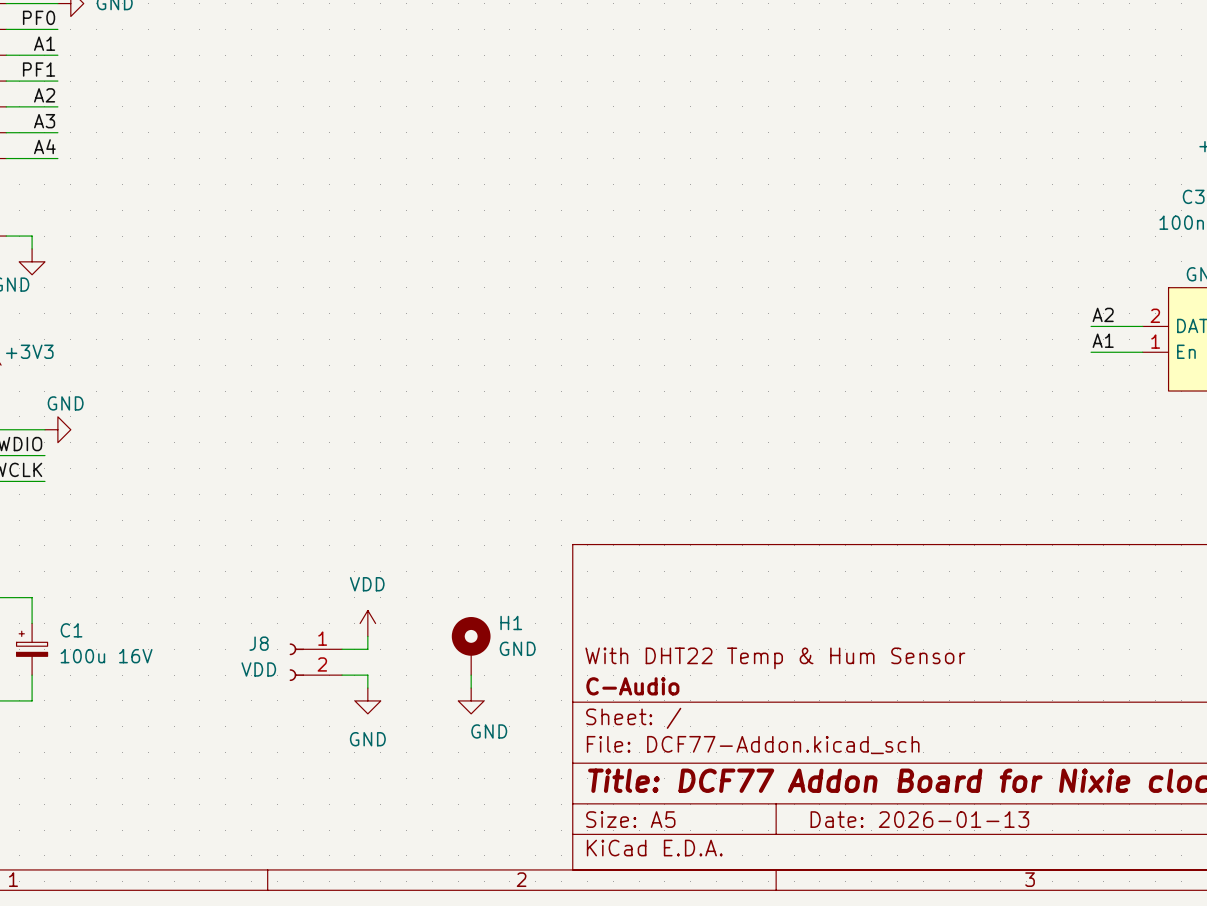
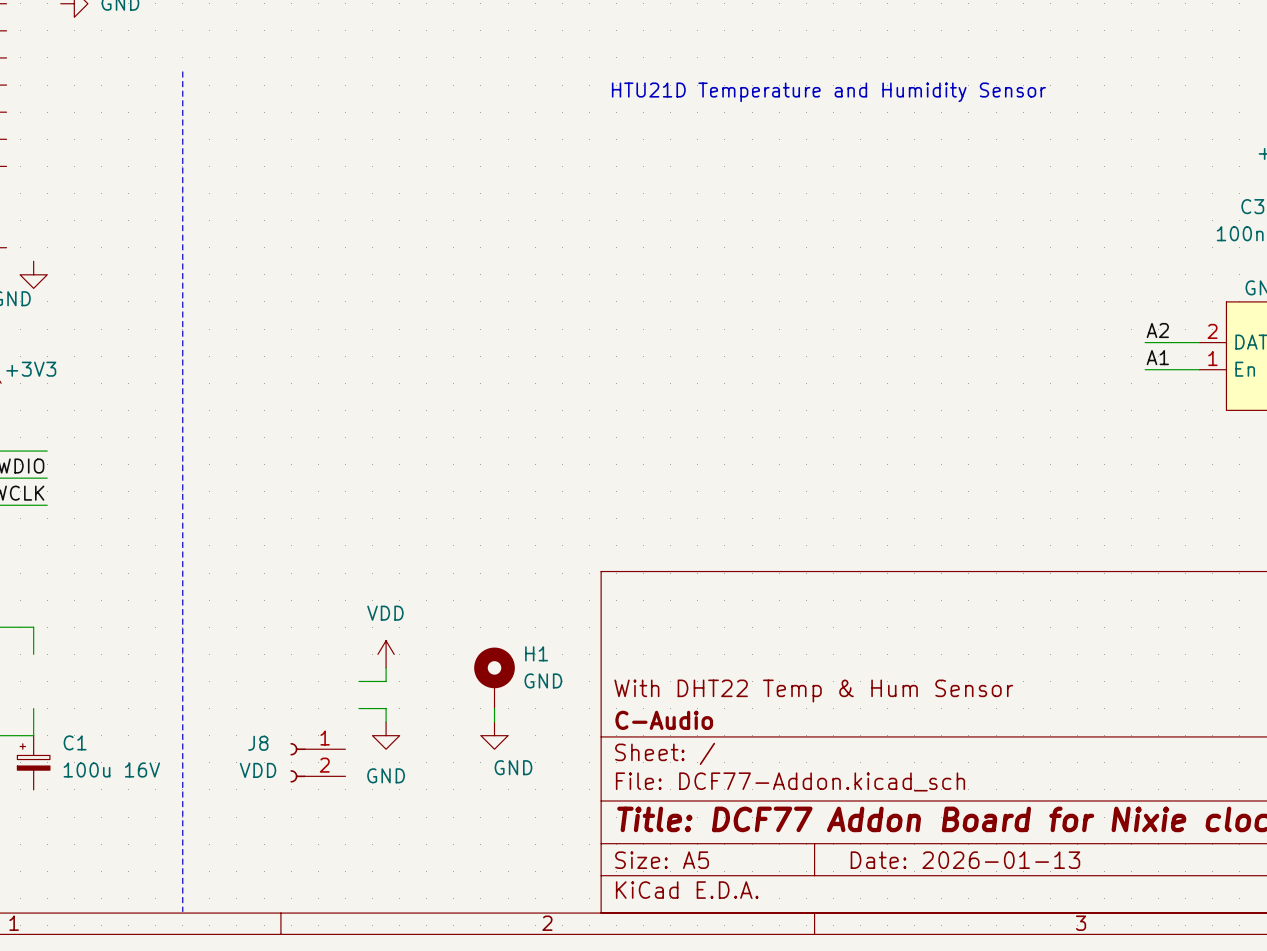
wire: (6, 3) (57, 3) -> none
label: PF0 (39, 17) -> none
wire: (6, 29) (57, 29) -> none
label: A1 (44, 43) -> none
wire: (6, 55) (57, 55) -> none
line: none -> (182, 71) (182, 911)
label: PF1 (39, 69) -> none
wire: (6, 81) (57, 81) -> none
text: none -> HTU21D Temperature and Humidity Sensor (828, 92)
label: A2 (44, 95) -> none
wire: (6, 106) (57, 106) -> none
label: A3 (44, 121) -> none
wire: (6, 132) (57, 132) -> none
label: A4 (44, 146) -> none
wire: (6, 158) (57, 158) -> none
wire: (6, 236) (32, 236) (32, 248) -> none
power symbol: GND (57, 429) -> none
C1 position: (32, 649) -> (33, 762)
J8 position: (315, 662) -> (317, 762)

